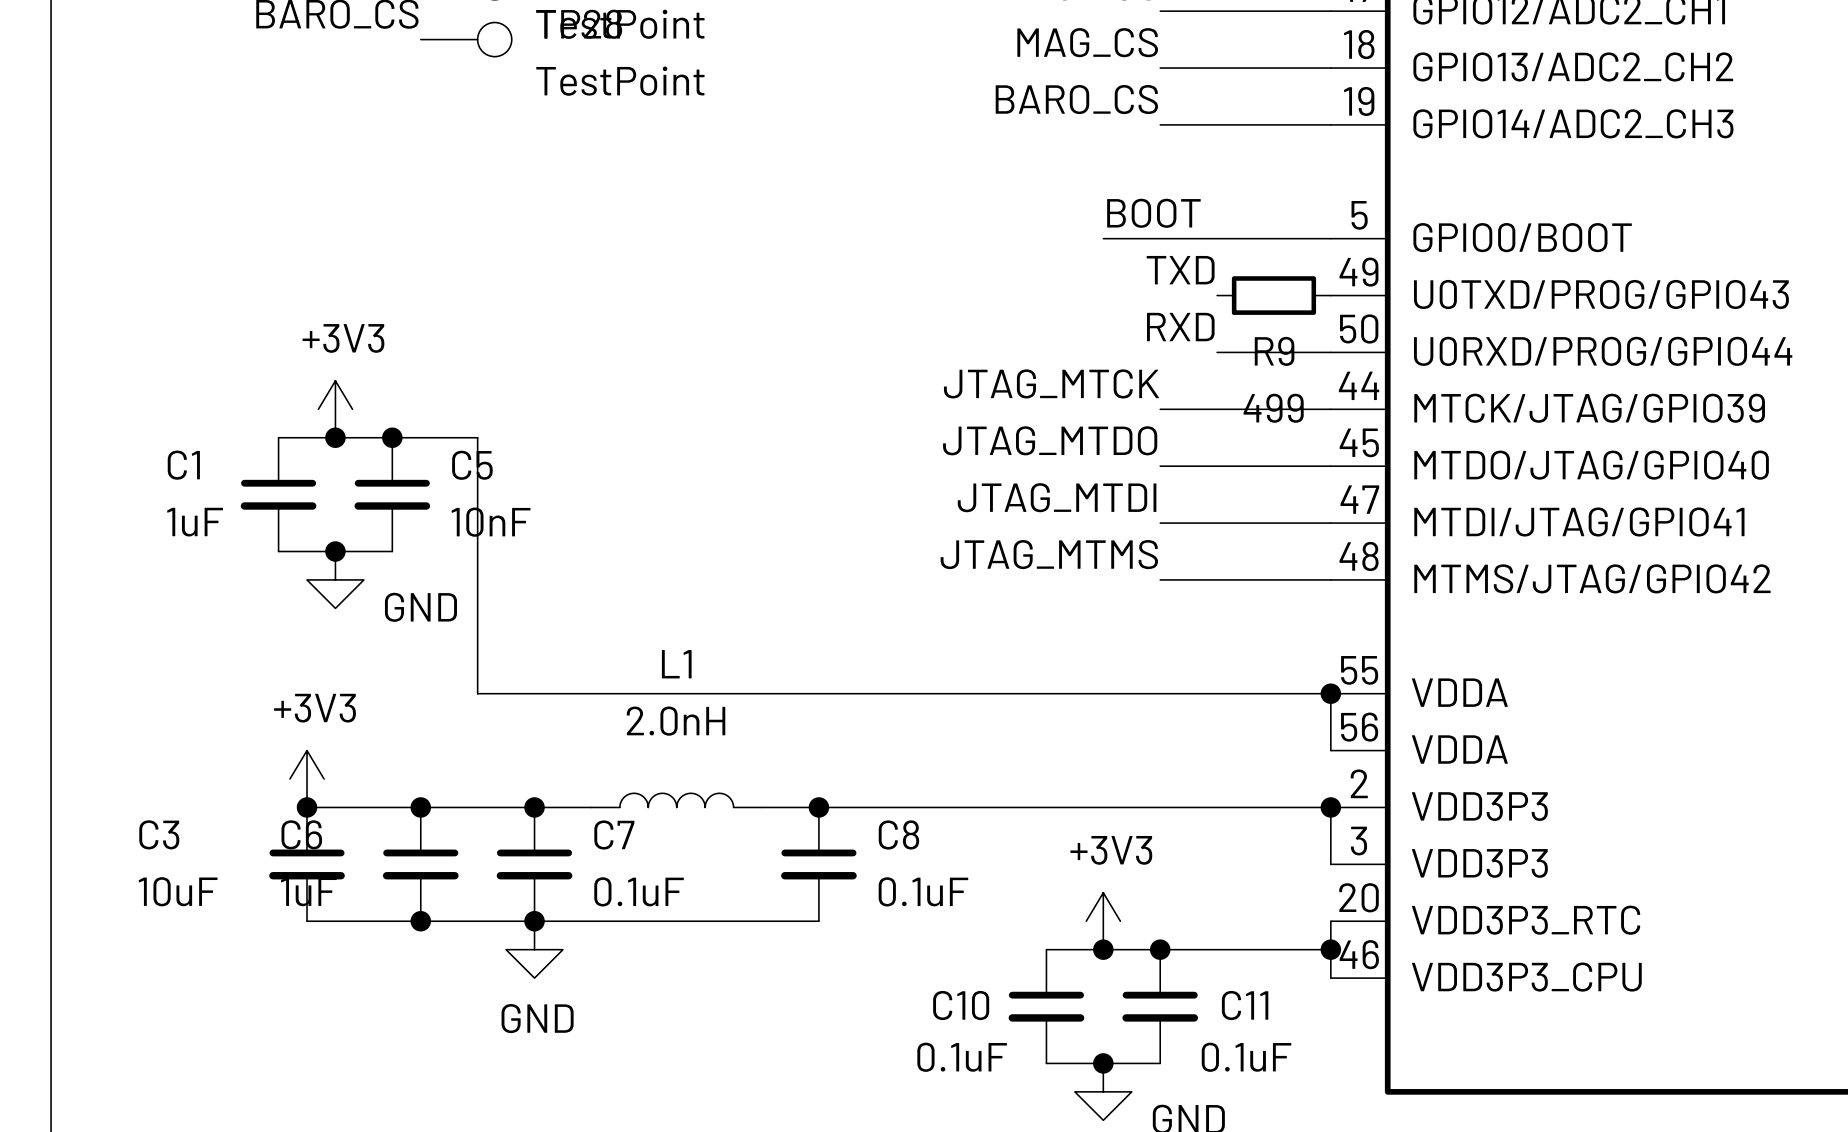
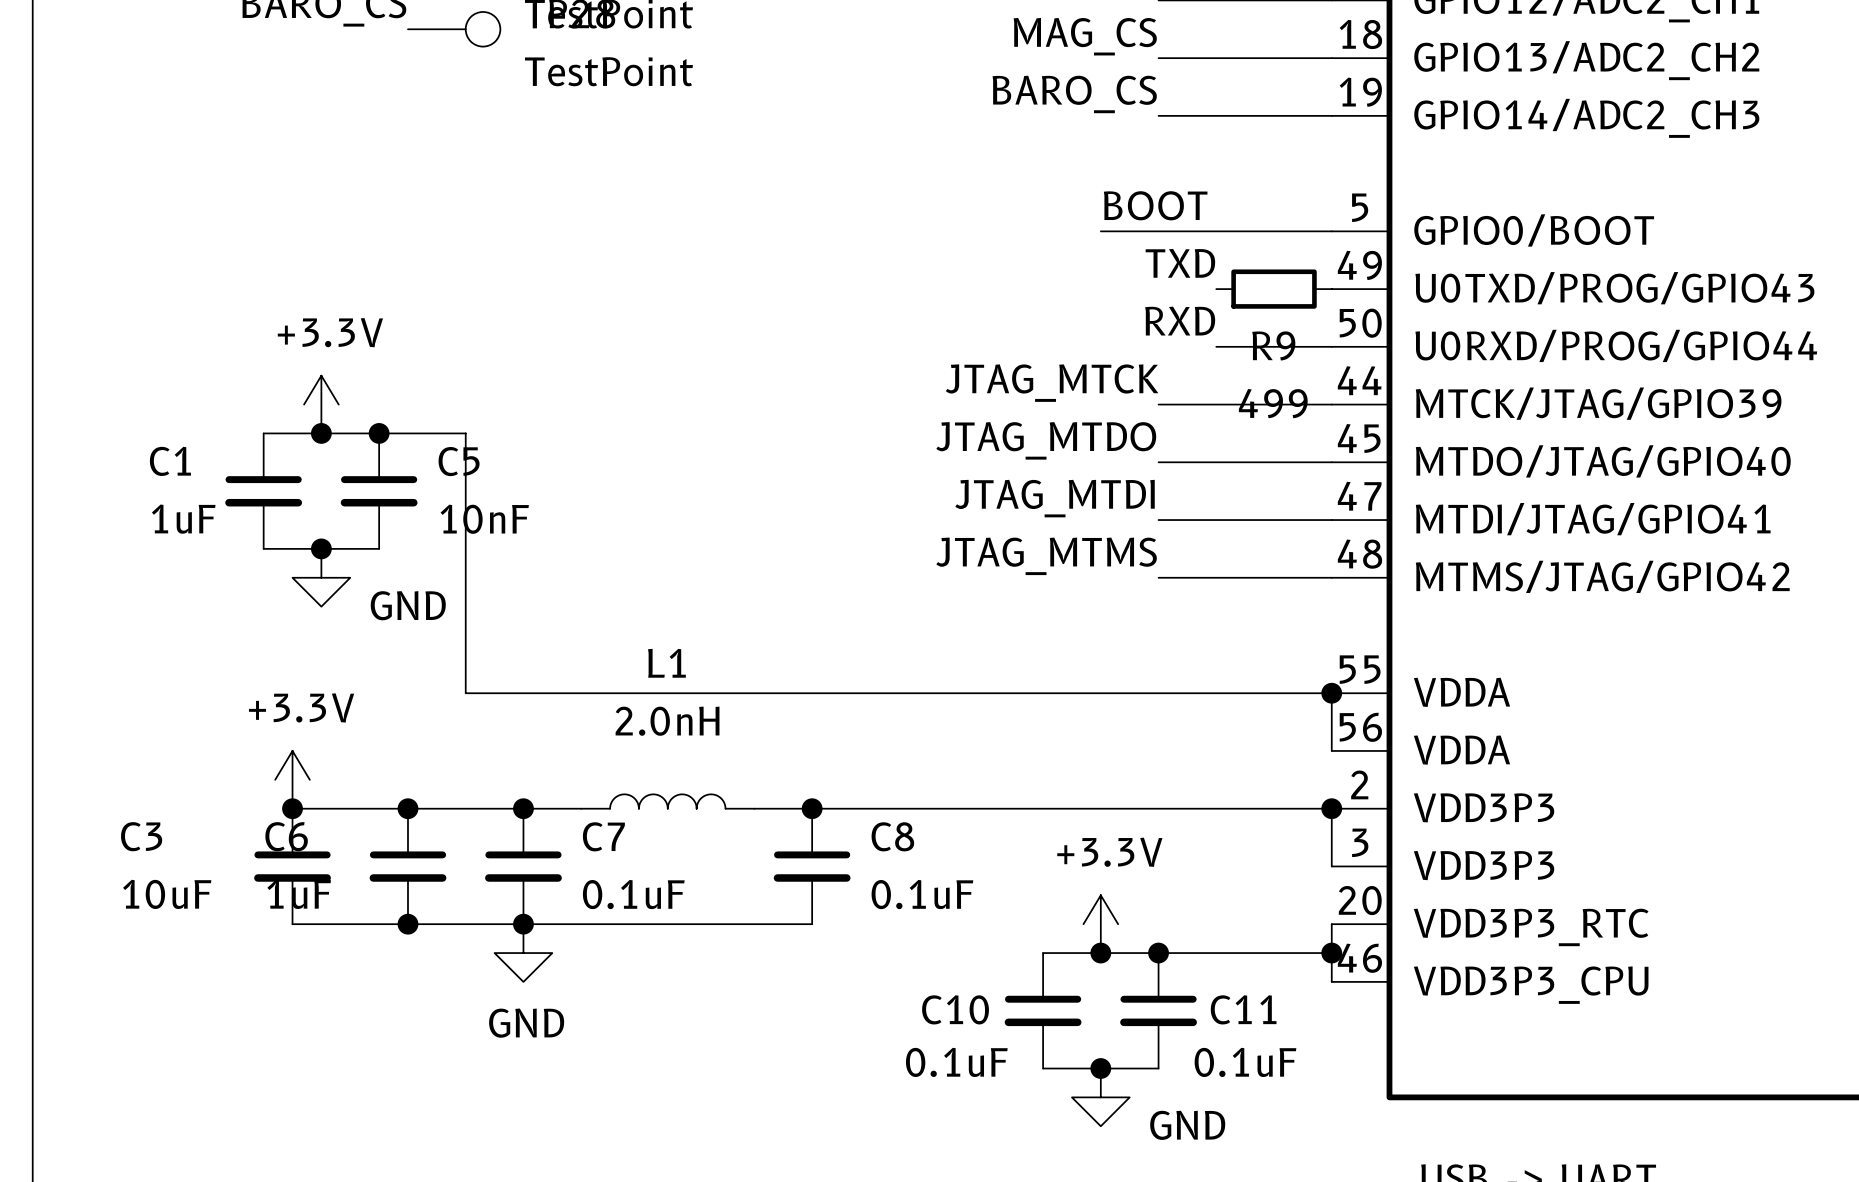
power symbol: +3V3 (335, 409) -> +3.3V (321, 404)
power symbol: +3V3 (307, 779) -> +3.3V (292, 779)
power symbol: +3V3 (1103, 921) -> +3.3V (1100, 924)

